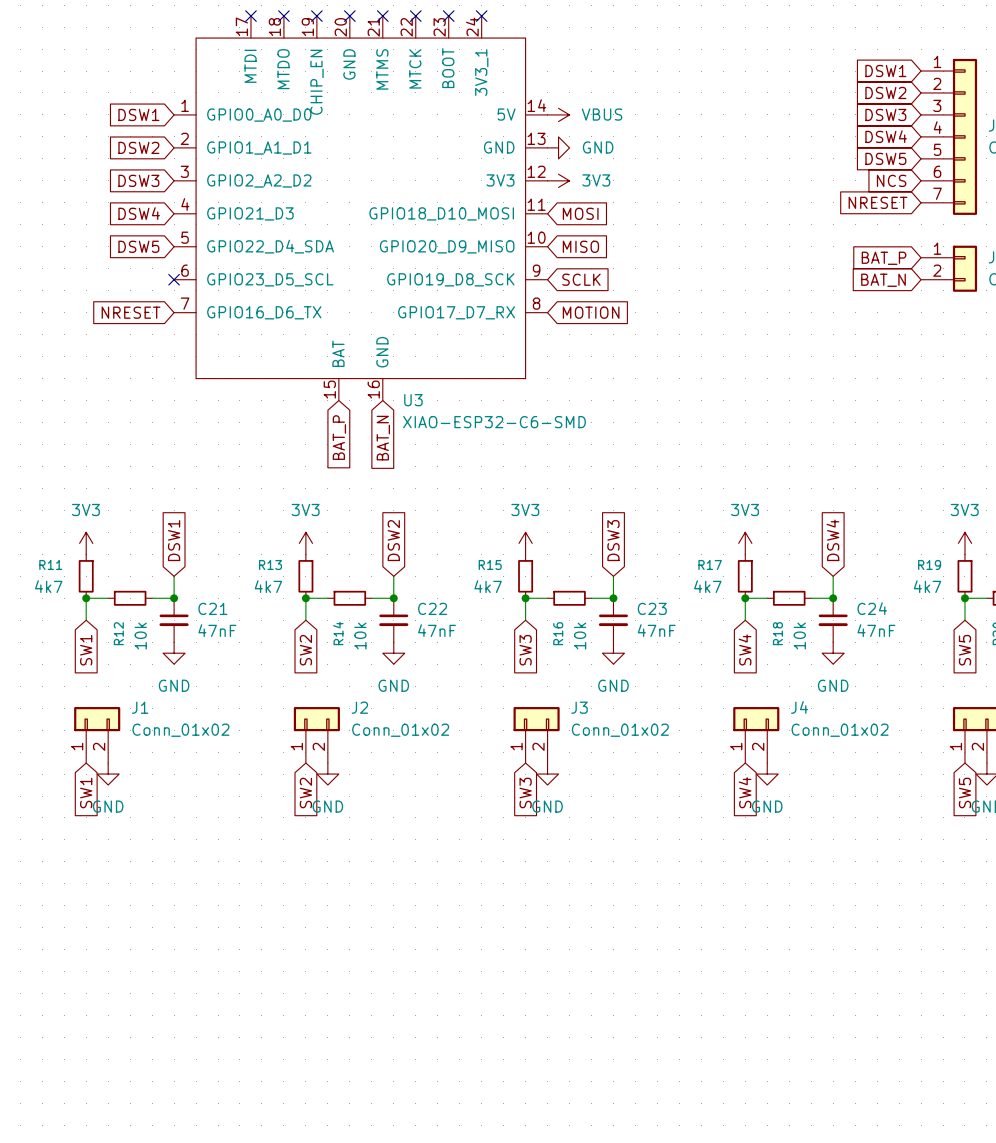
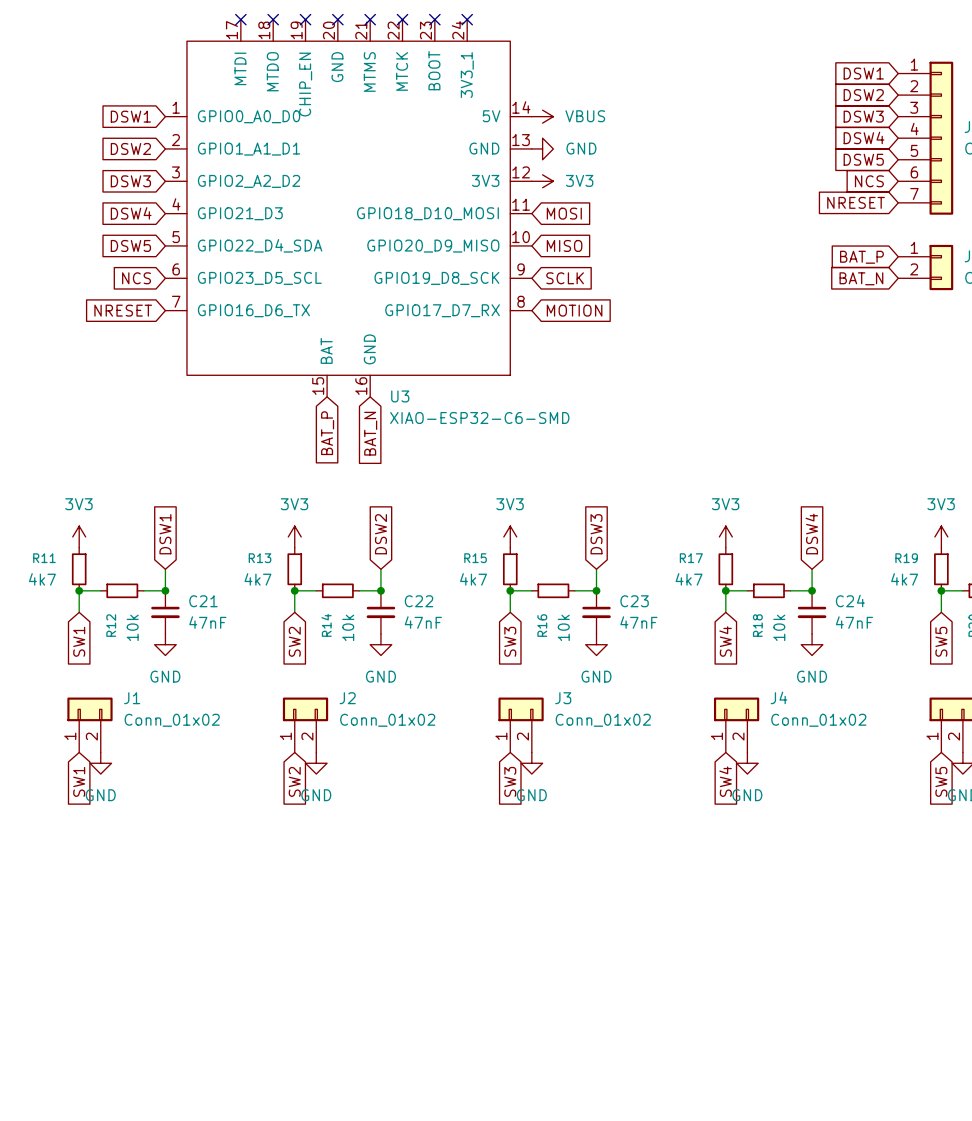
global label: none -> NCS (136, 278)
no-connect mark: (174, 279) -> none

